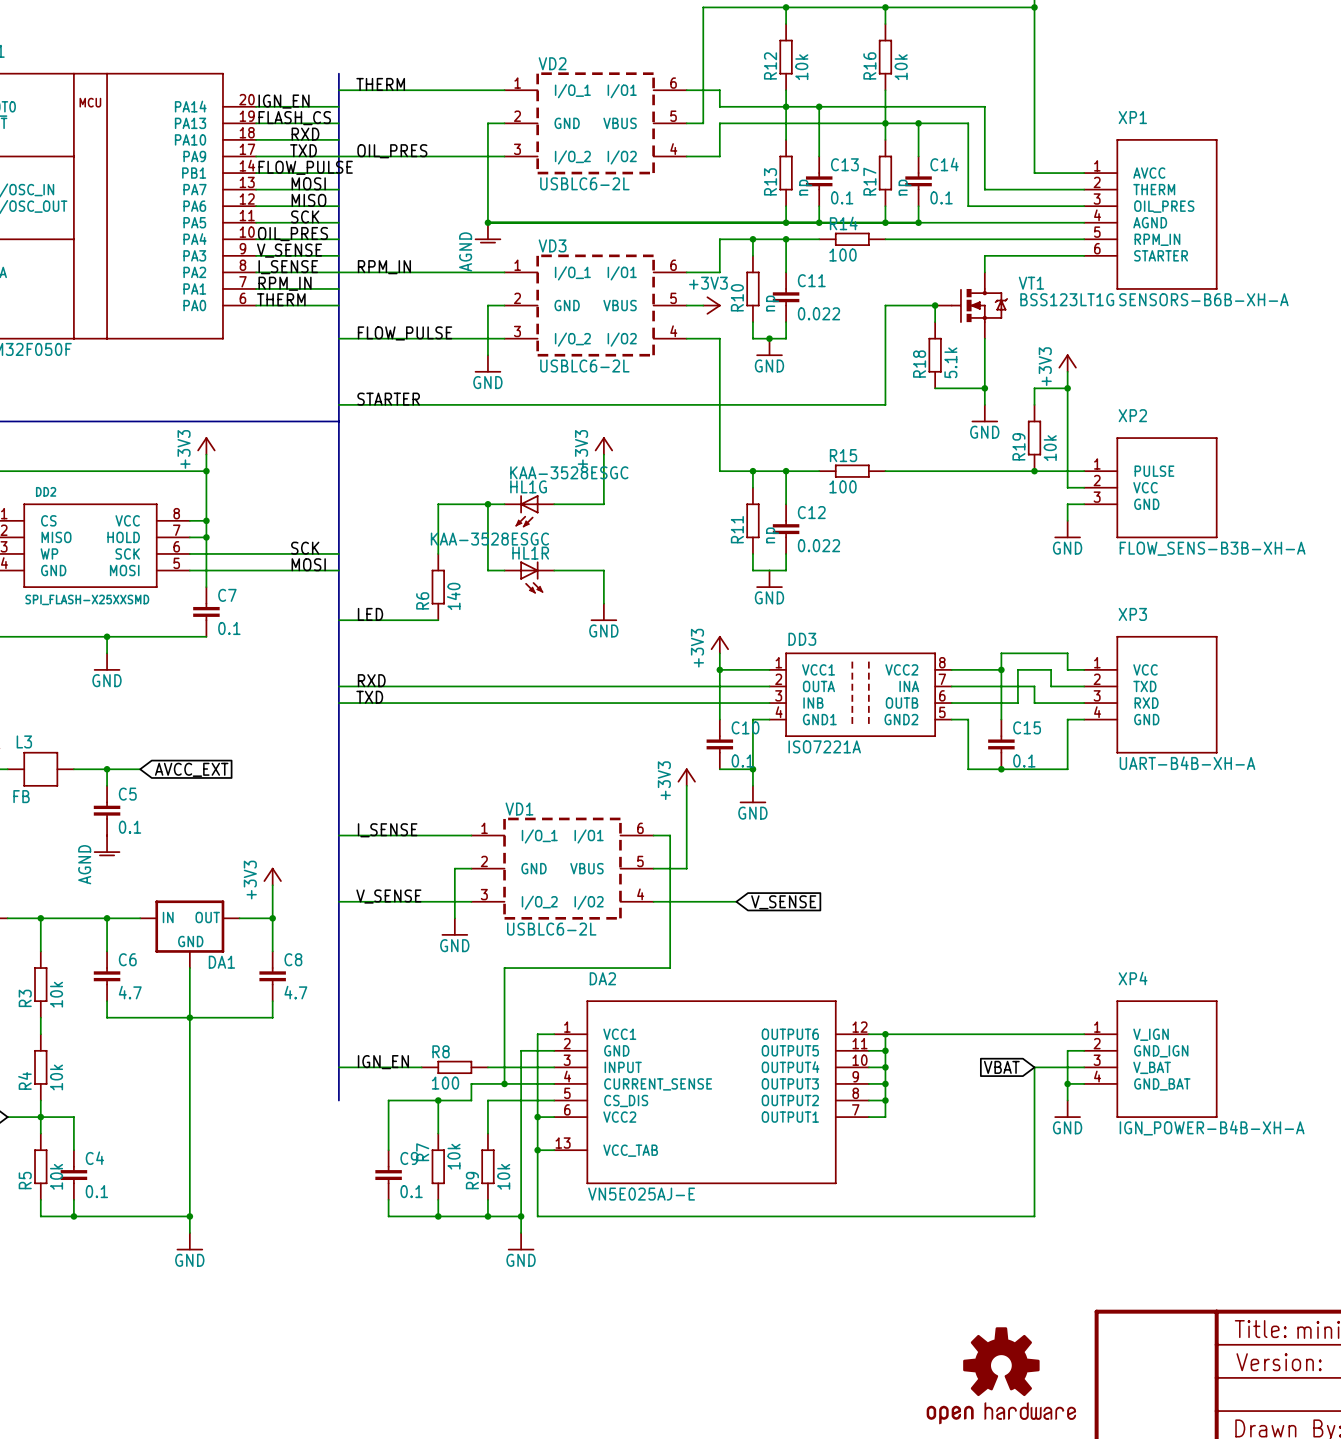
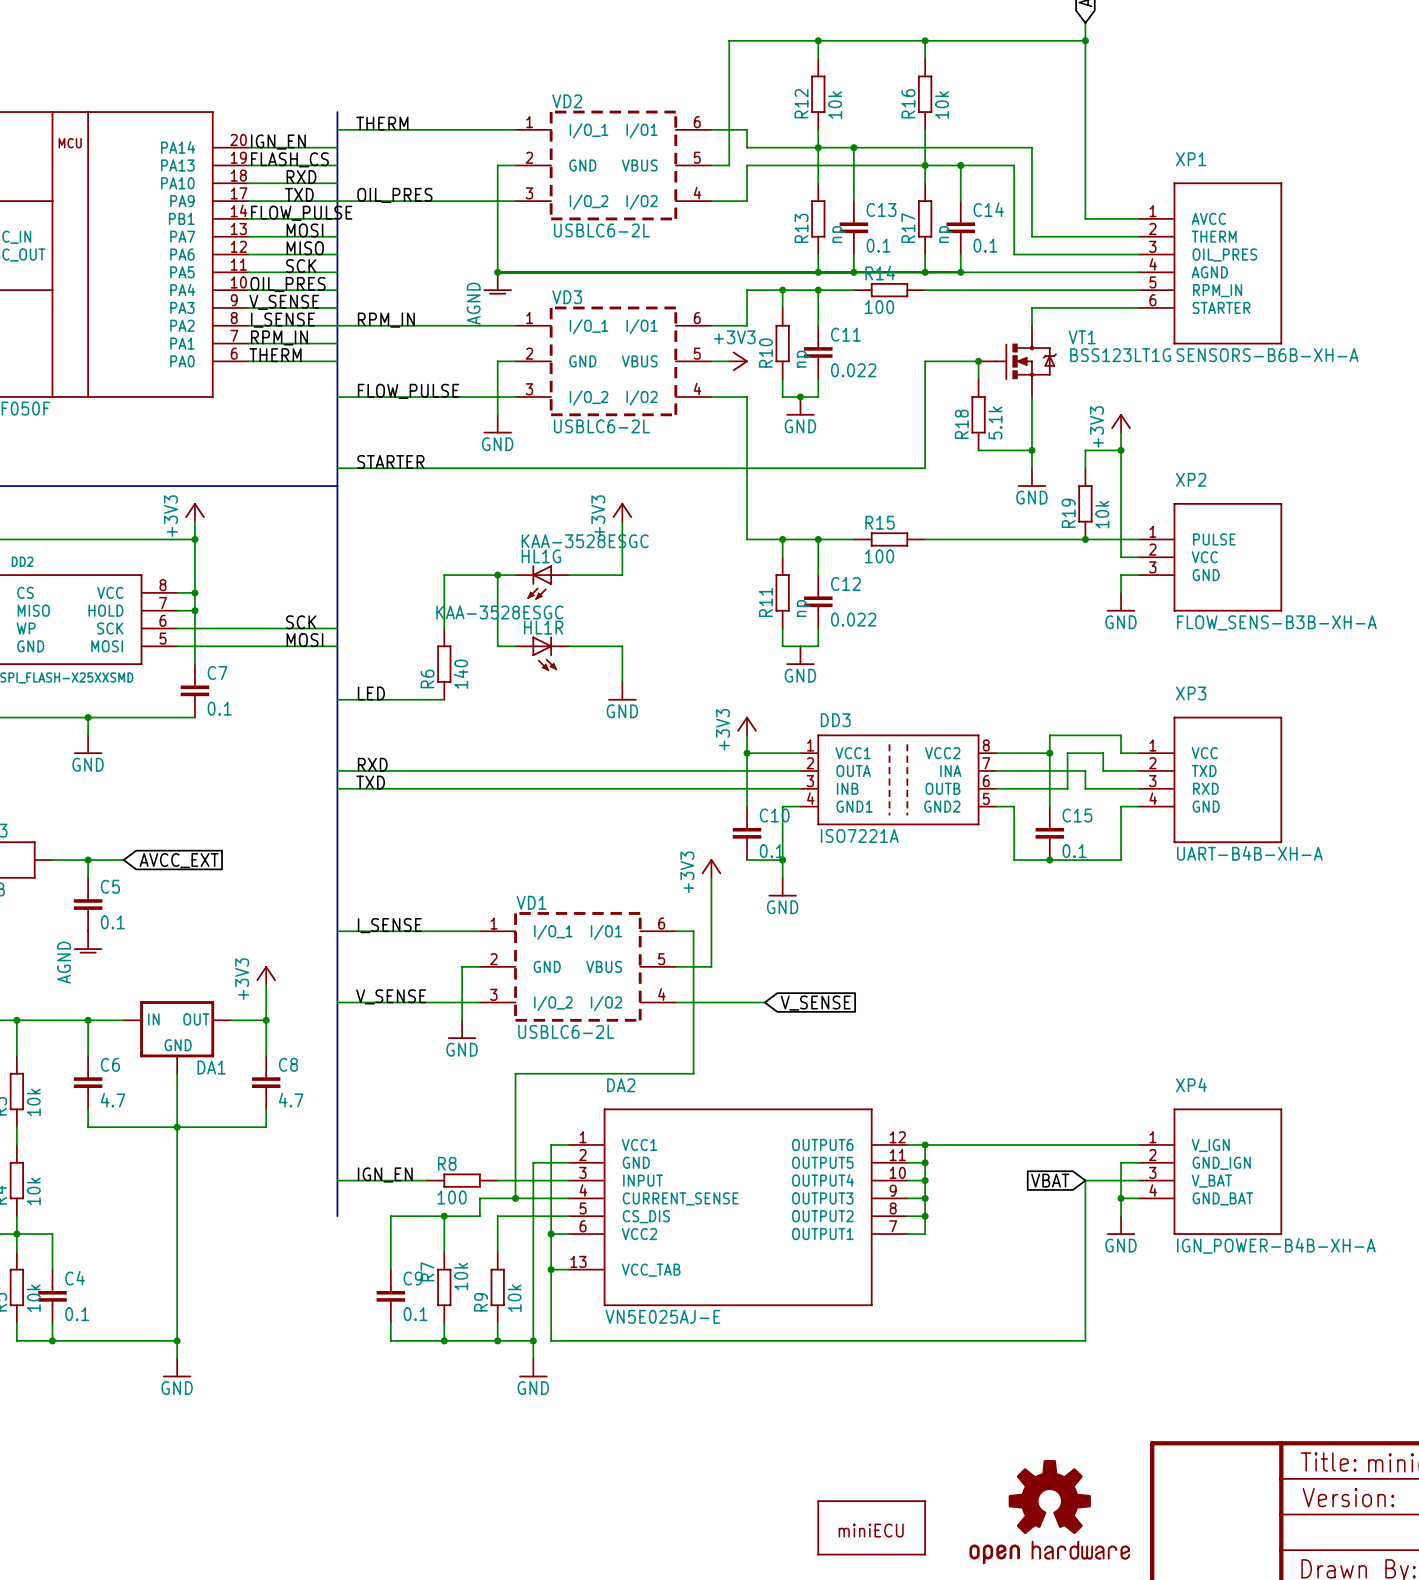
part: none -> (871, 1527)

